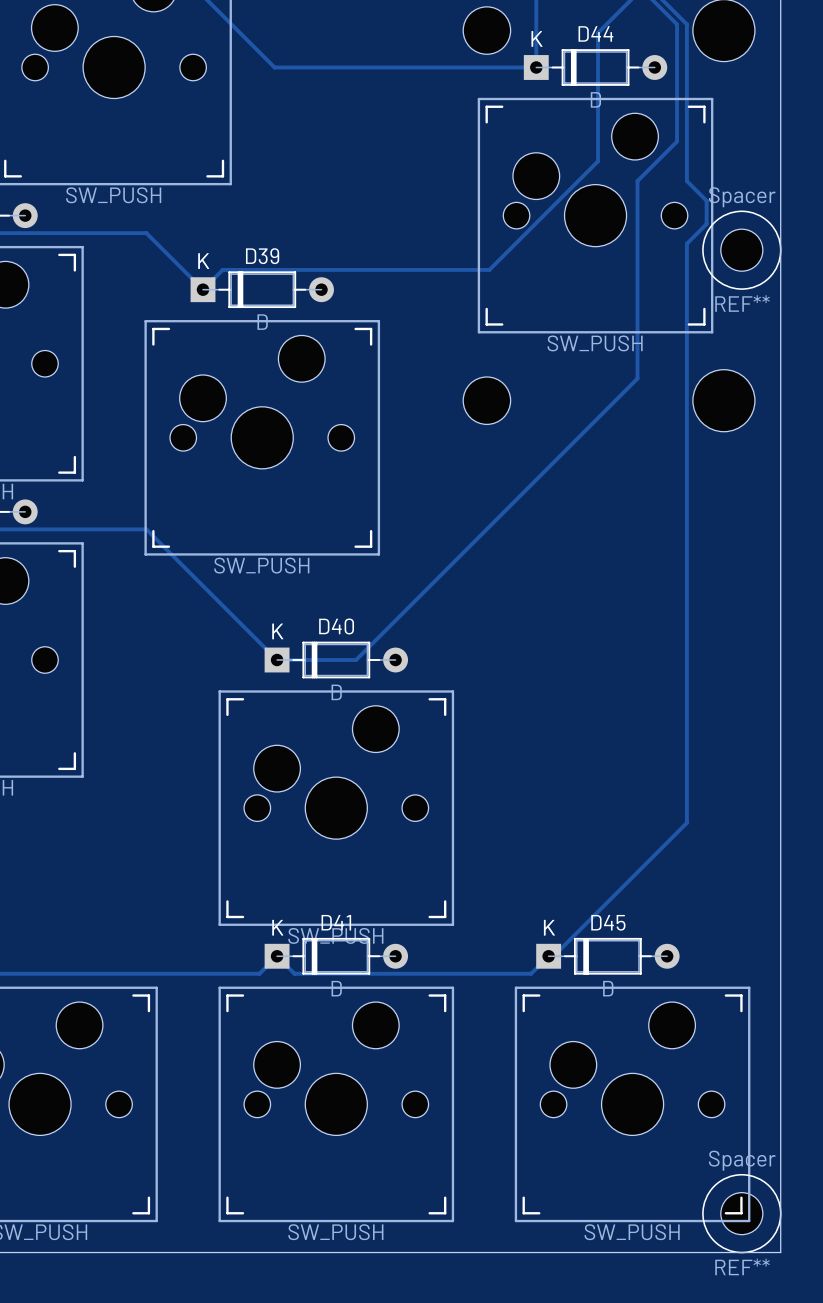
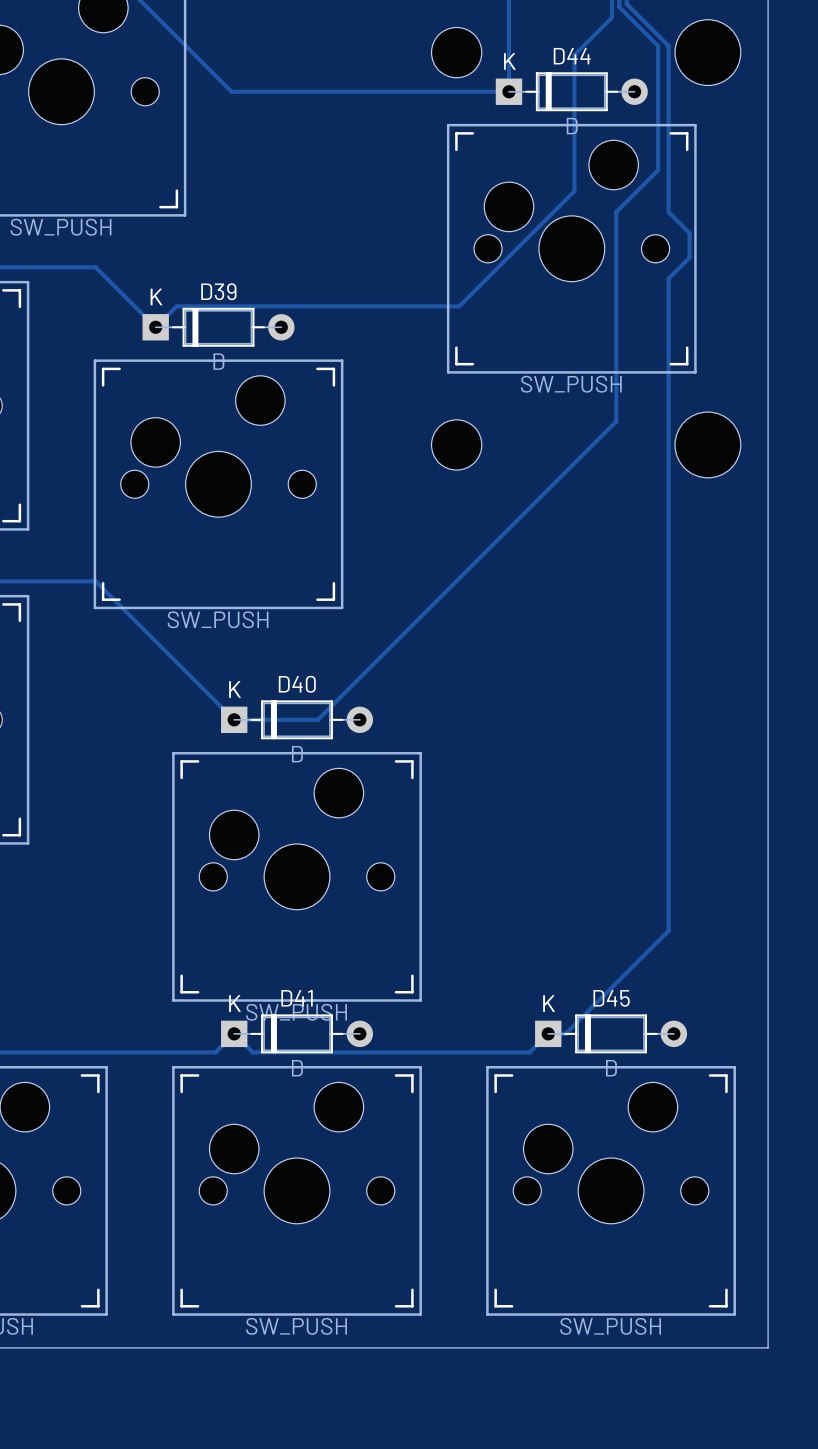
REF**: Spacer (741, 250) -> none
track: (686, 822) (553, 956) (548, 956) (531, 973) -> (668, 892) (668, 930) (565, 1033) (548, 1033) (529, 1052) (503, 1052)
D45 position: (607, 956) -> (611, 1033)
REF**: Spacer (741, 1213) -> none

